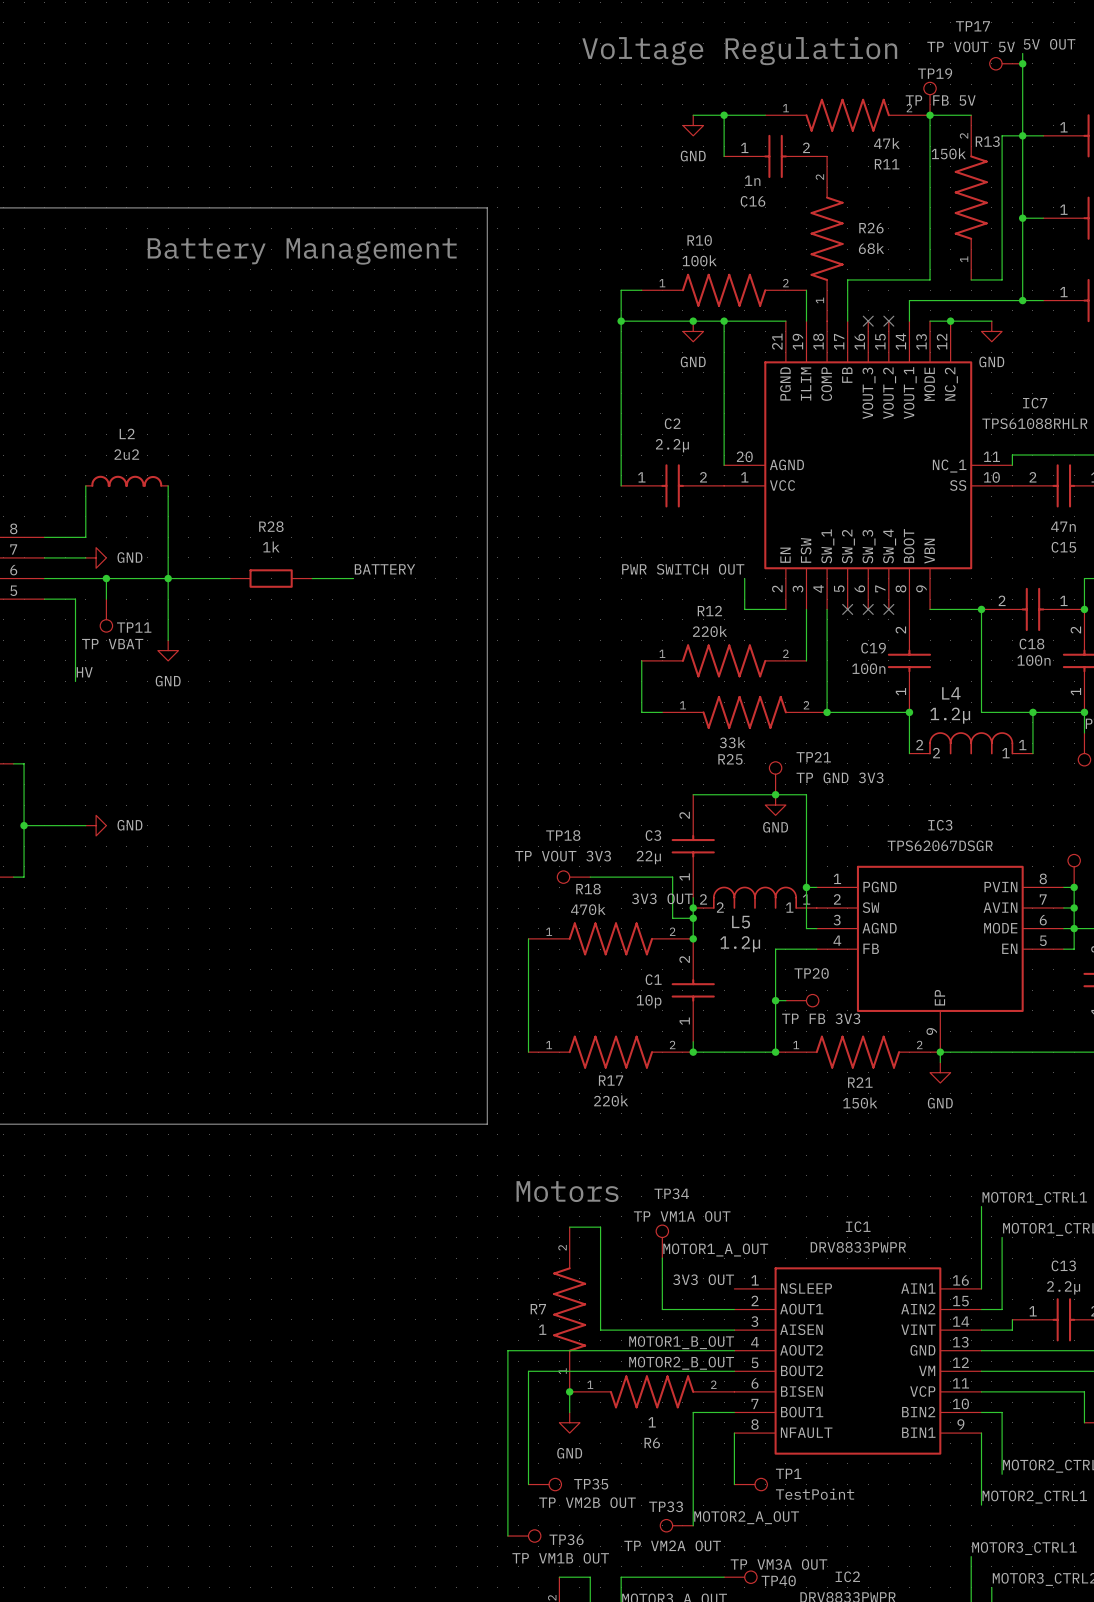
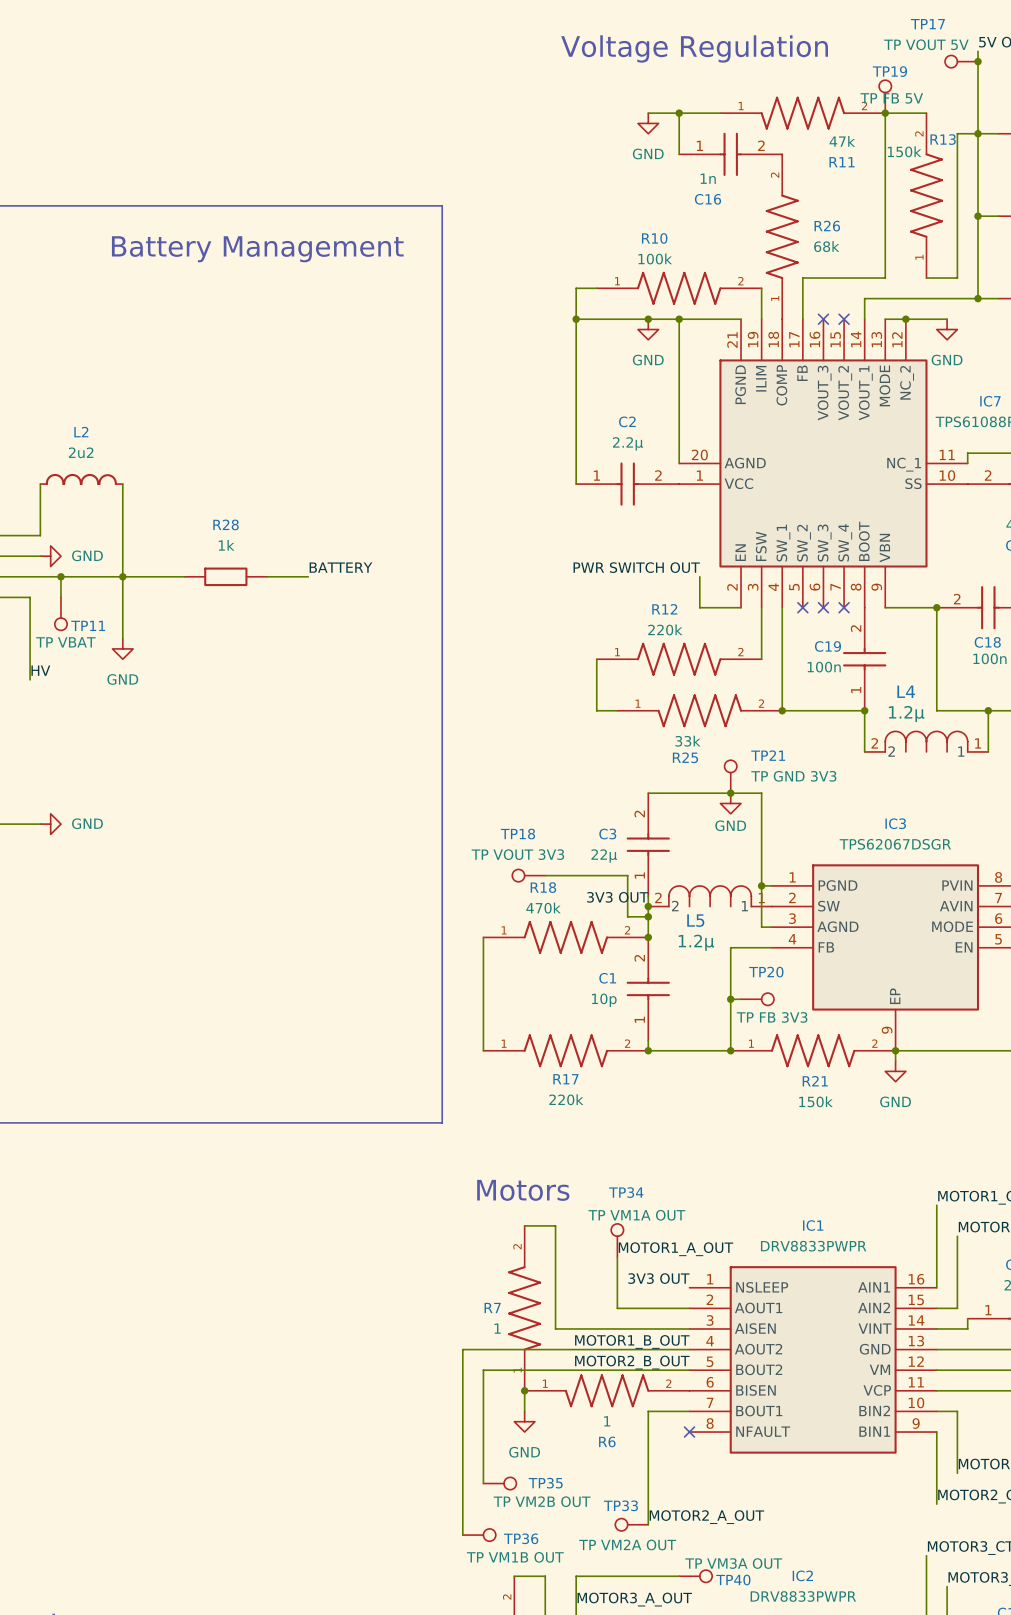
wire: (734, 1433) (734, 1484) -> none
no-connect mark: none -> (689, 1432)
TP1: TestPoint (750, 1484) -> none

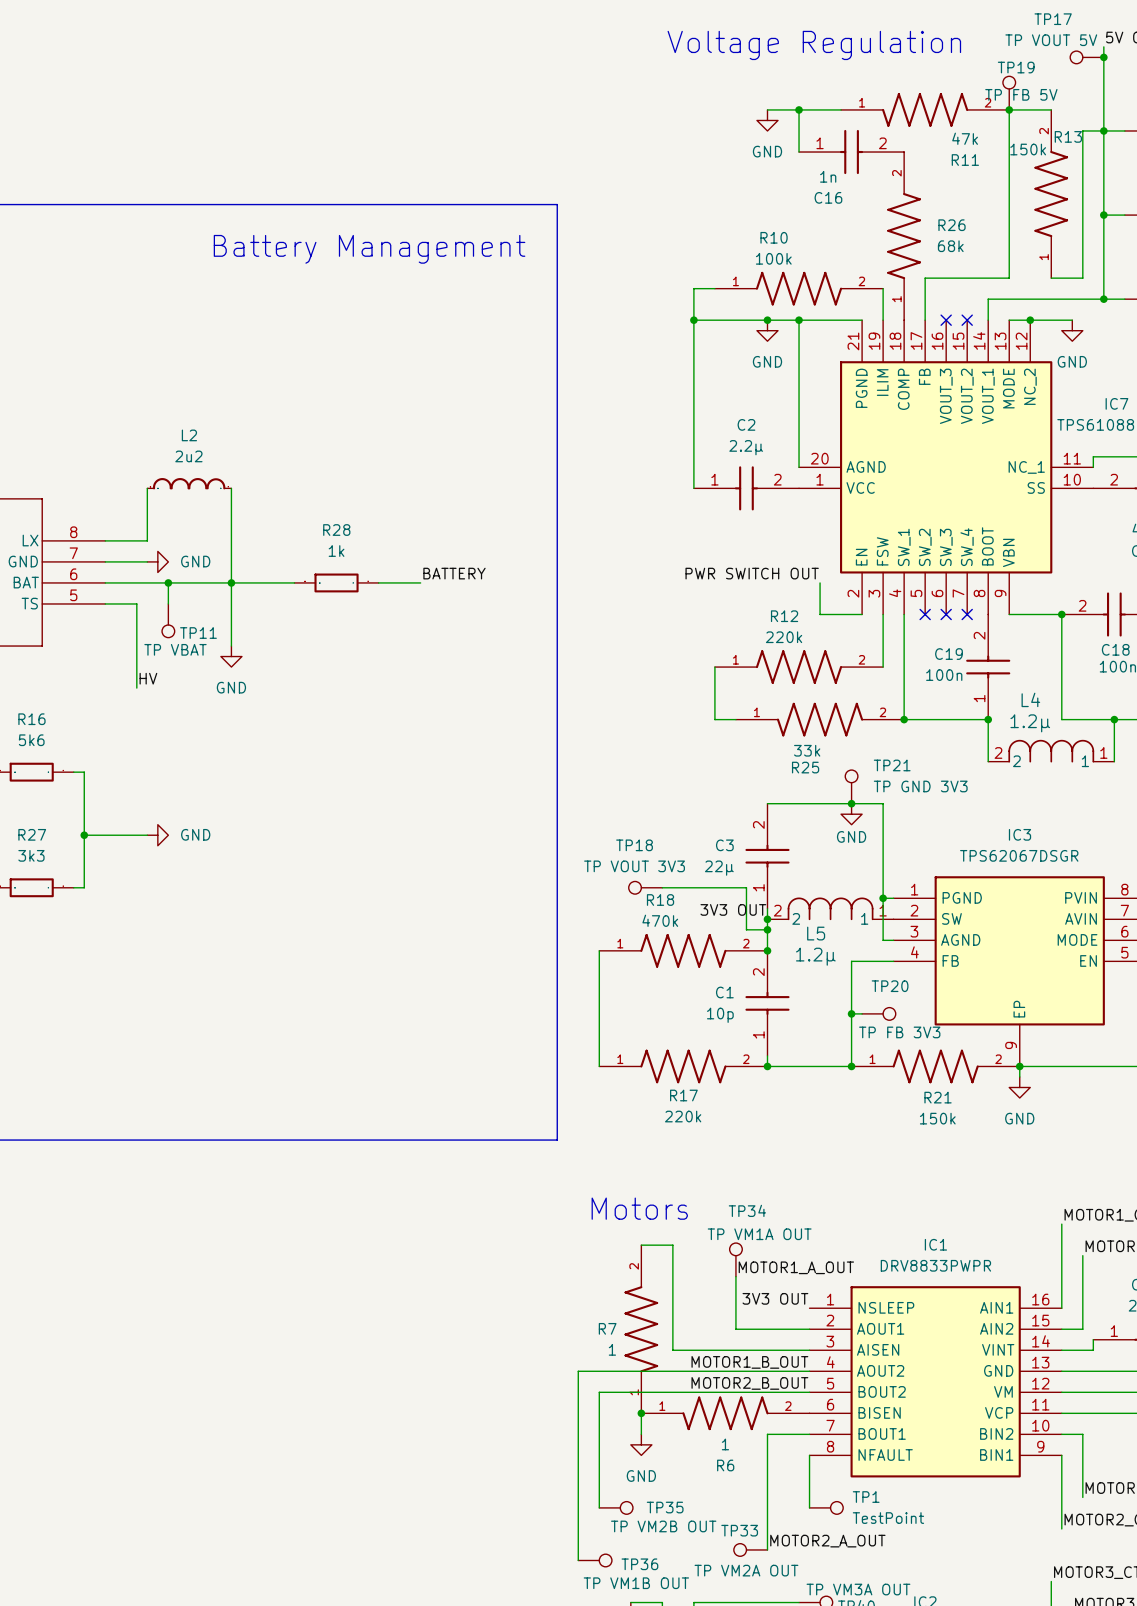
wire: none -> (809, 1455) (809, 1507)
no-connect mark: (689, 1432) -> none
TP1: none -> TestPoint (826, 1507)

